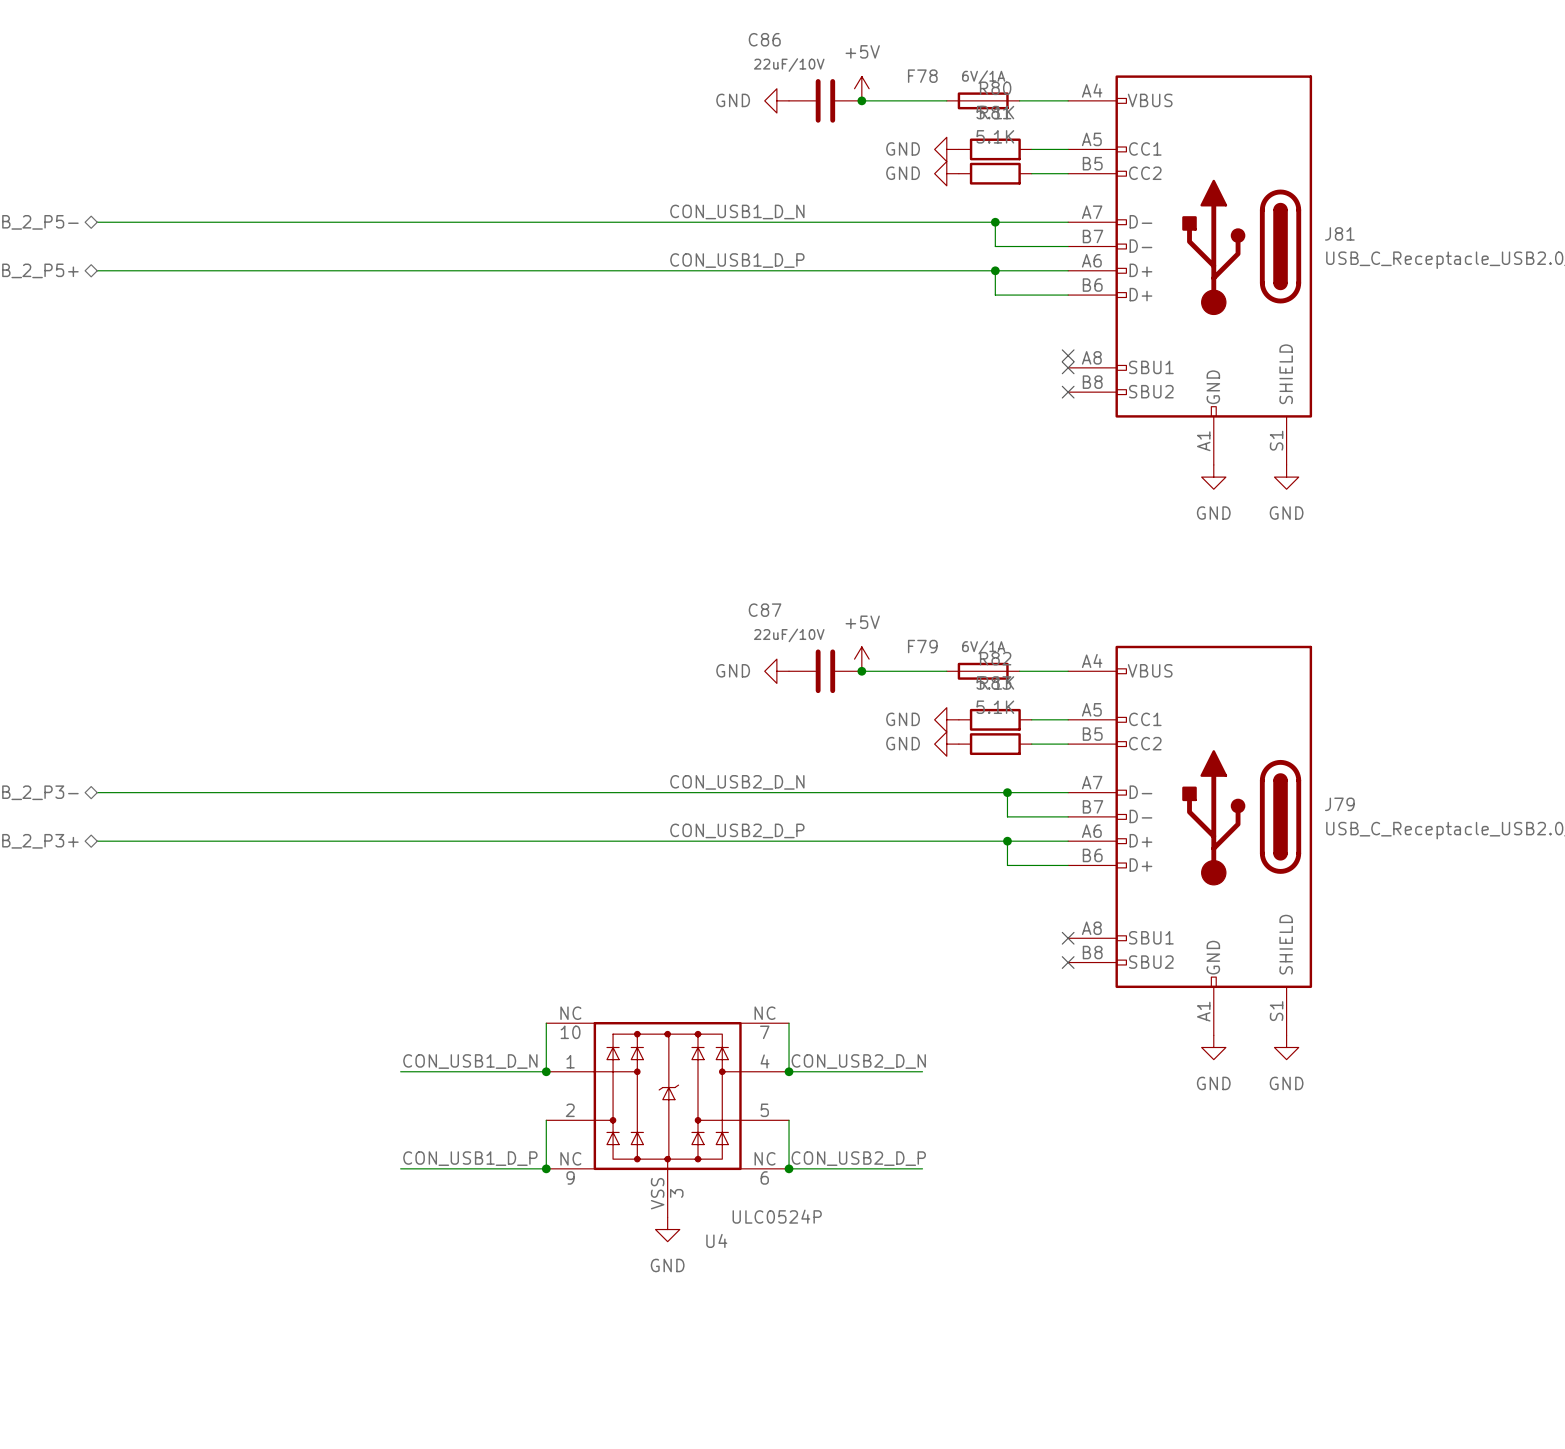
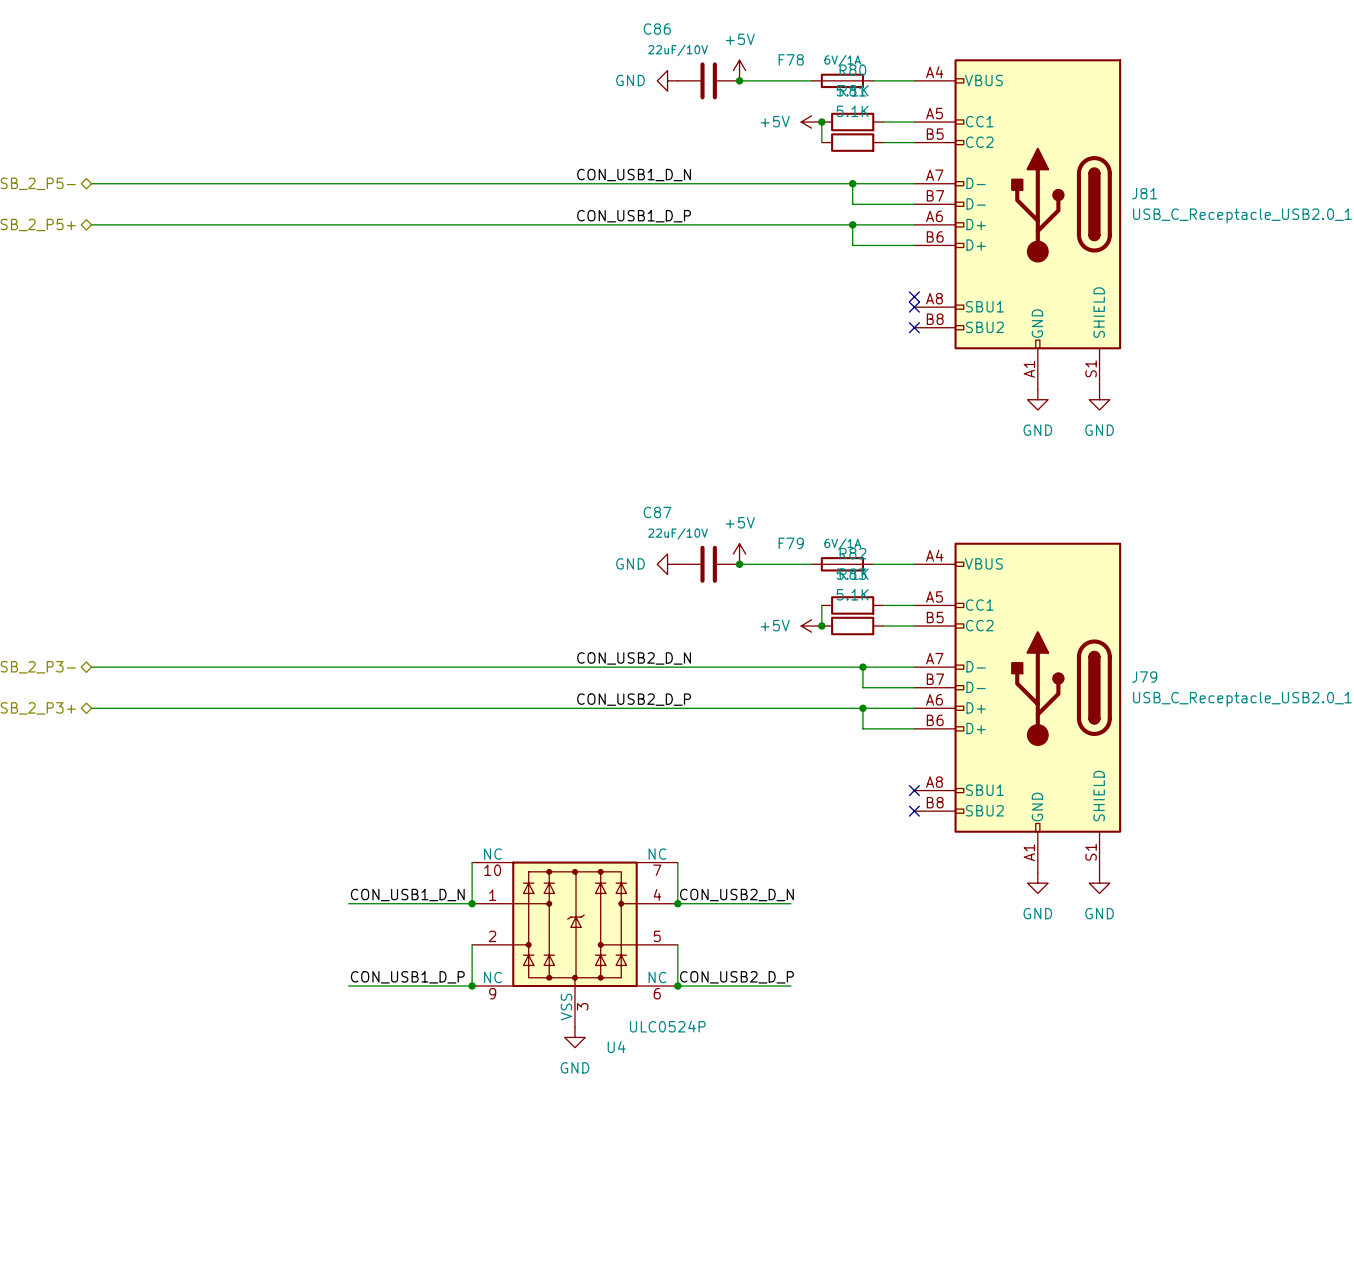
power symbol: GND (946, 149) -> +5V (811, 122)
wire: none -> (821, 122) (821, 142)
junction: none -> (821, 122)
power symbol: GND (946, 173) -> none
power symbol: GND (946, 719) -> none
wire: none -> (821, 605) (821, 626)
power symbol: GND (946, 744) -> +5V (811, 626)
junction: none -> (821, 626)

